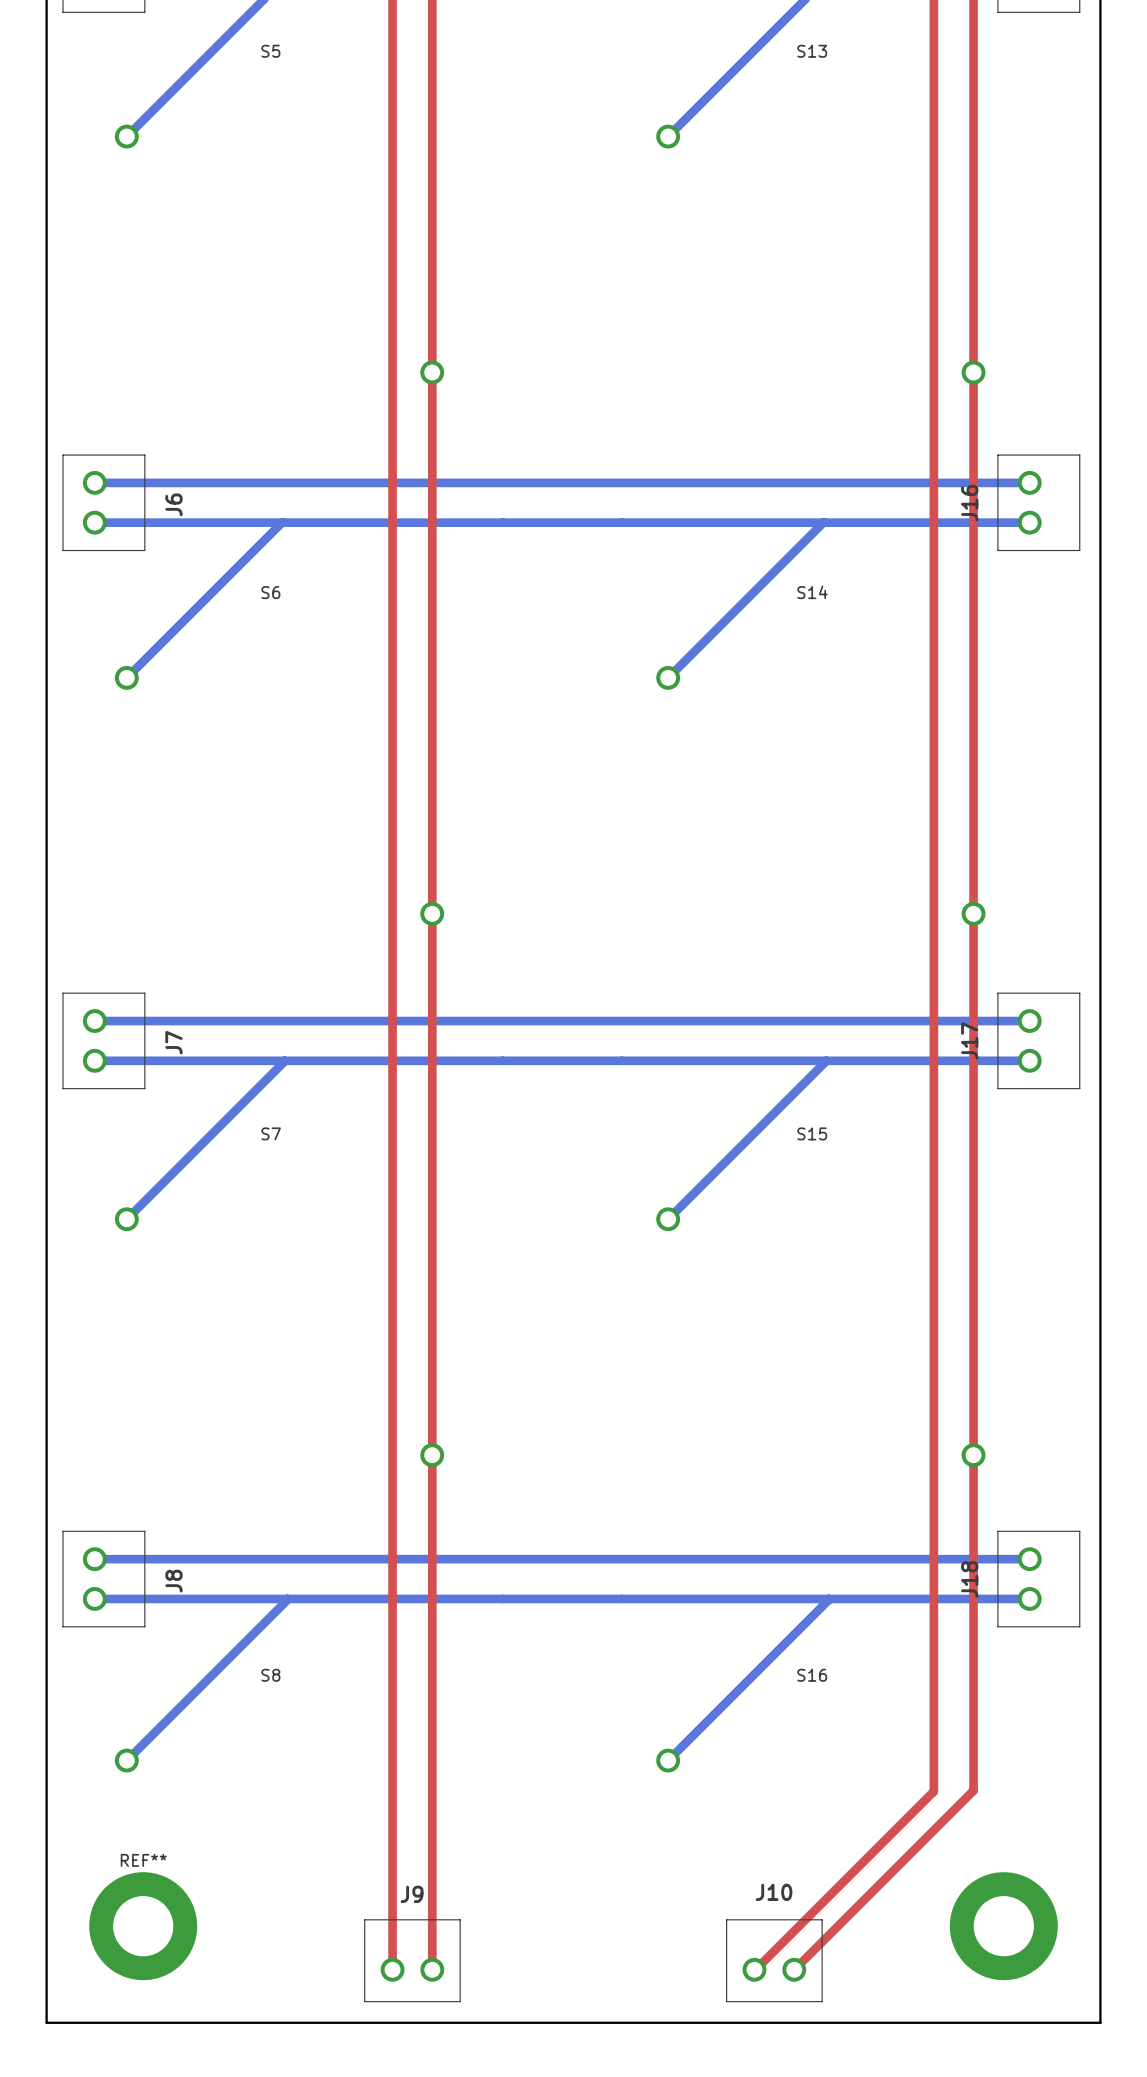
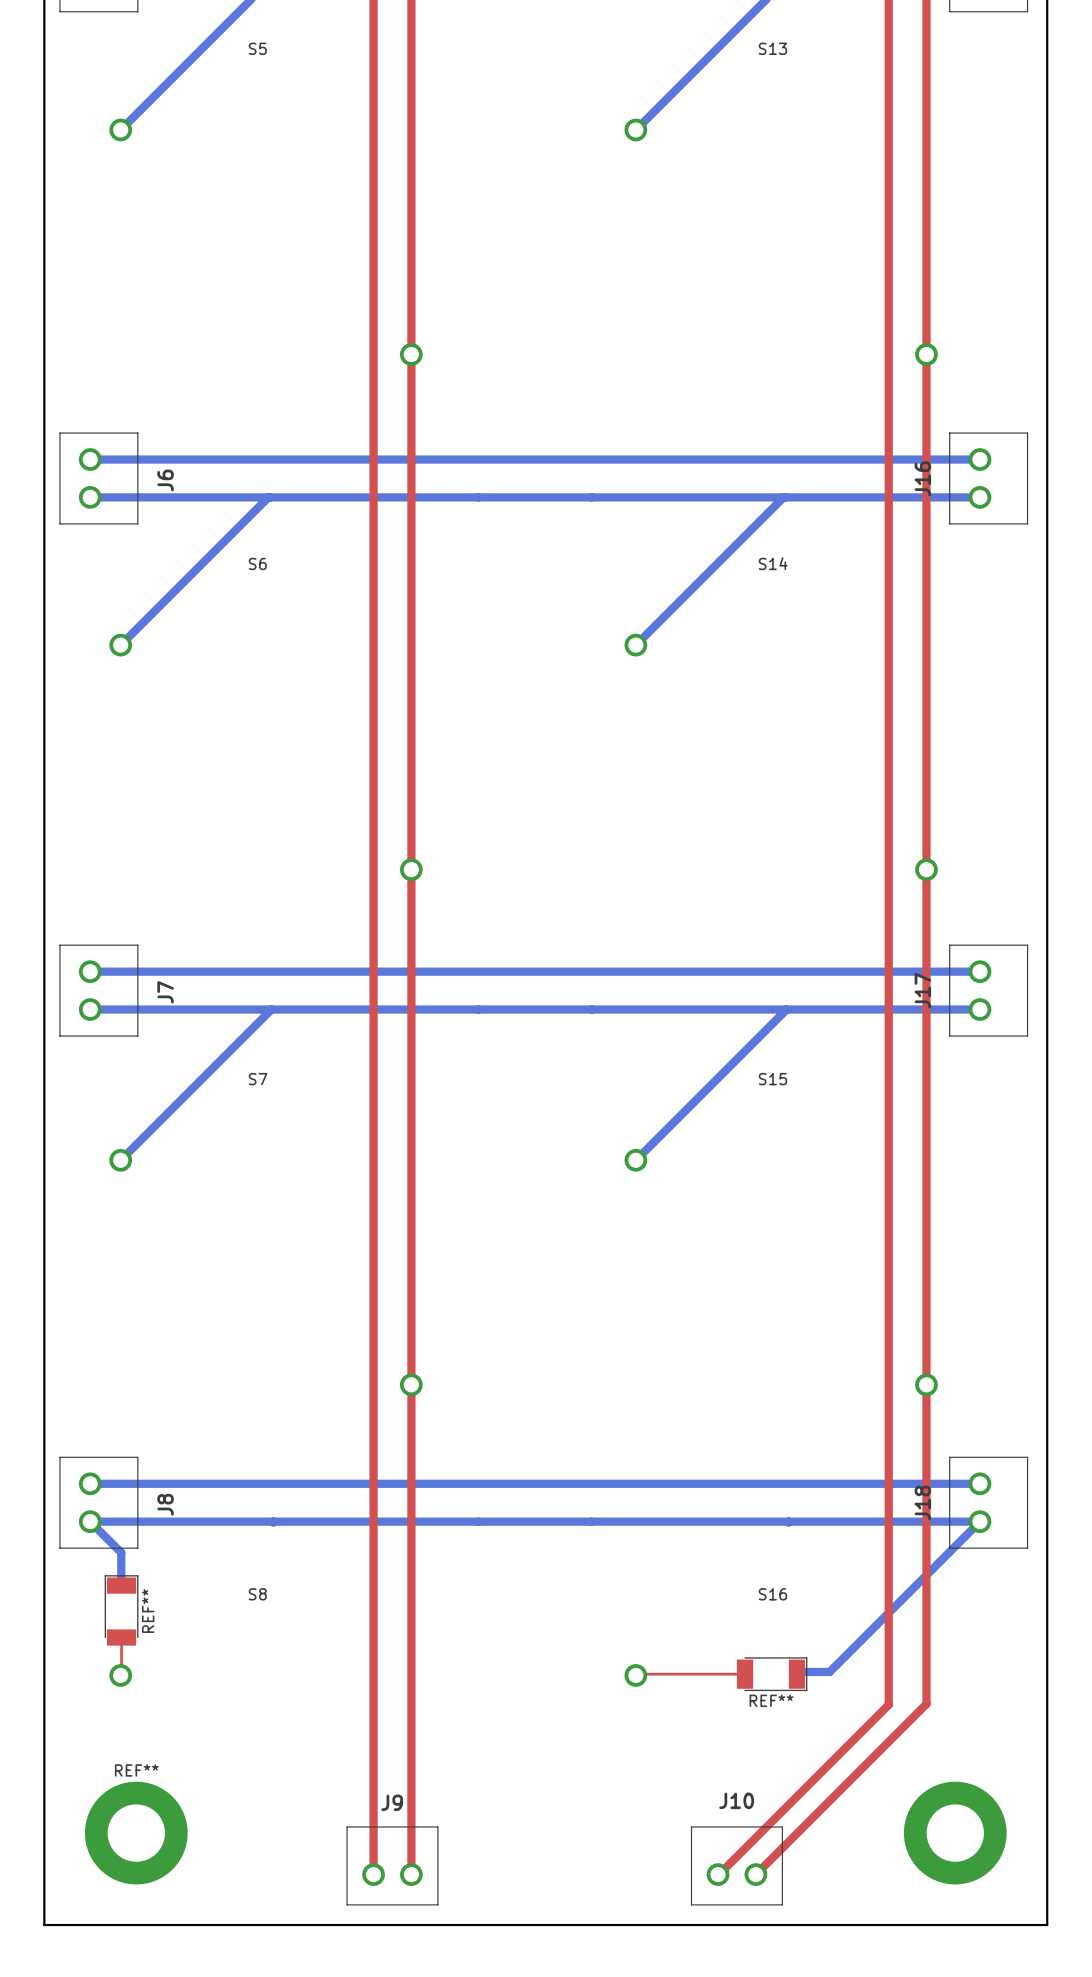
bottom track: none -> (90, 1521) (121, 1552) (121, 1587)
bottom track: none -> (979, 1521) (829, 1671) (797, 1673)
bottom track: (287, 1600) (126, 1760) -> none
bottom track: (828, 1600) (668, 1760) -> none
REF**: none -> (121, 1610)
top track: none -> (121, 1637) (120, 1675)
top track: none -> (745, 1674) (635, 1675)
REF**: none -> (772, 1674)

